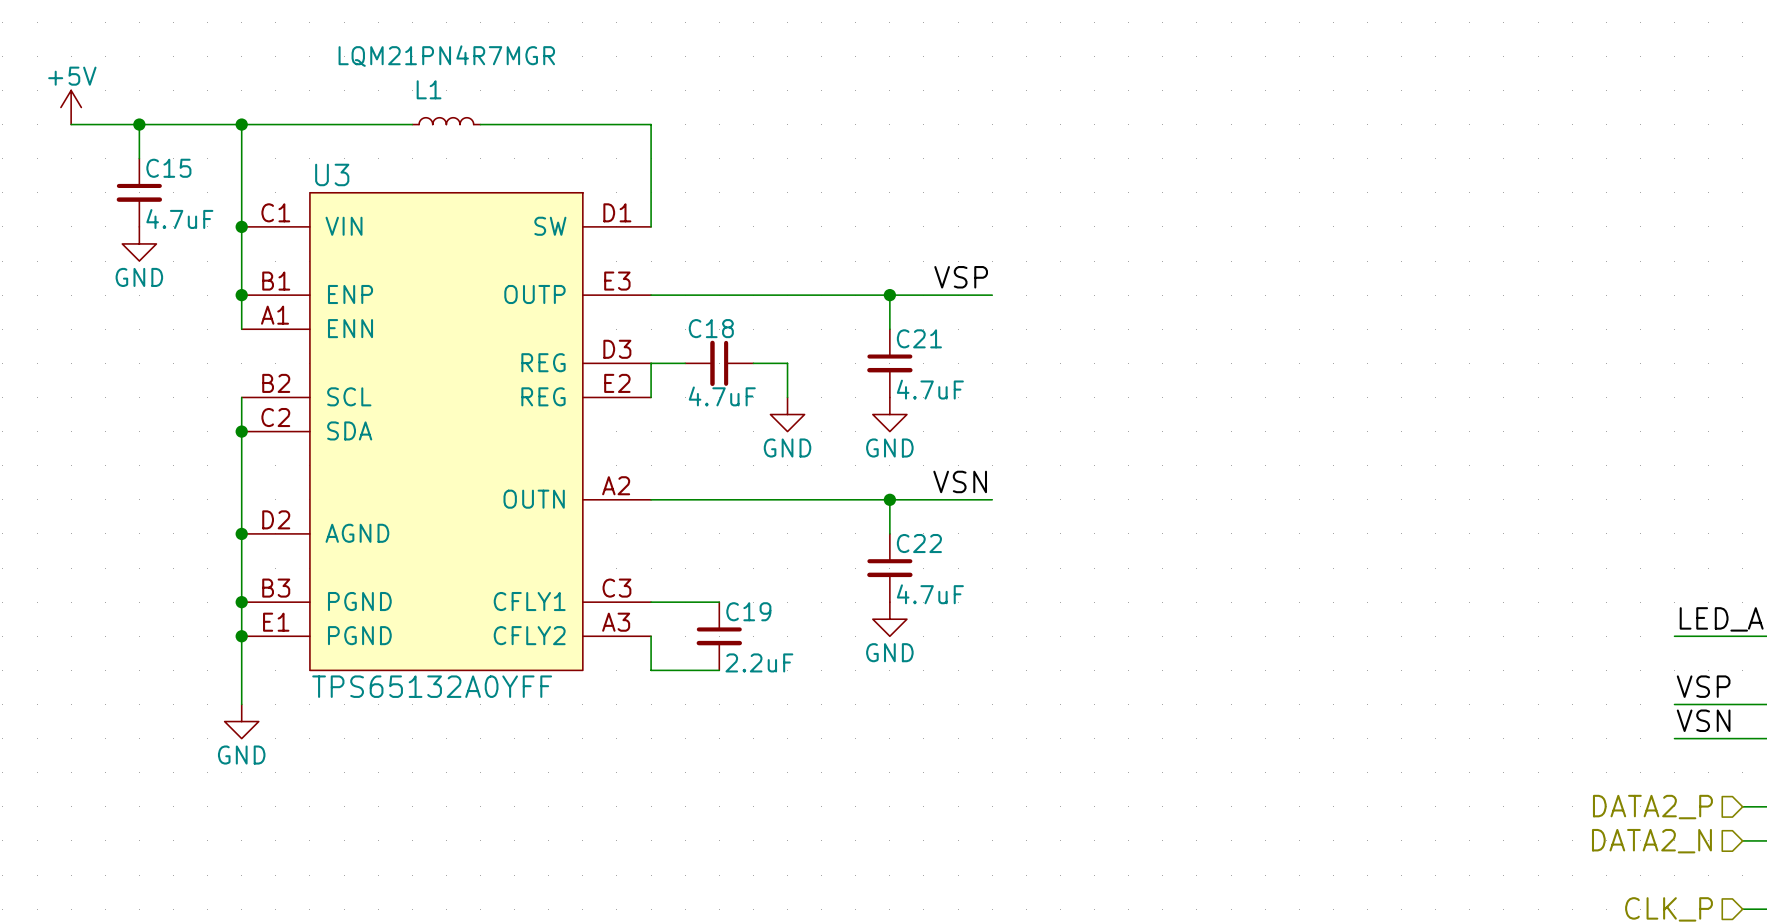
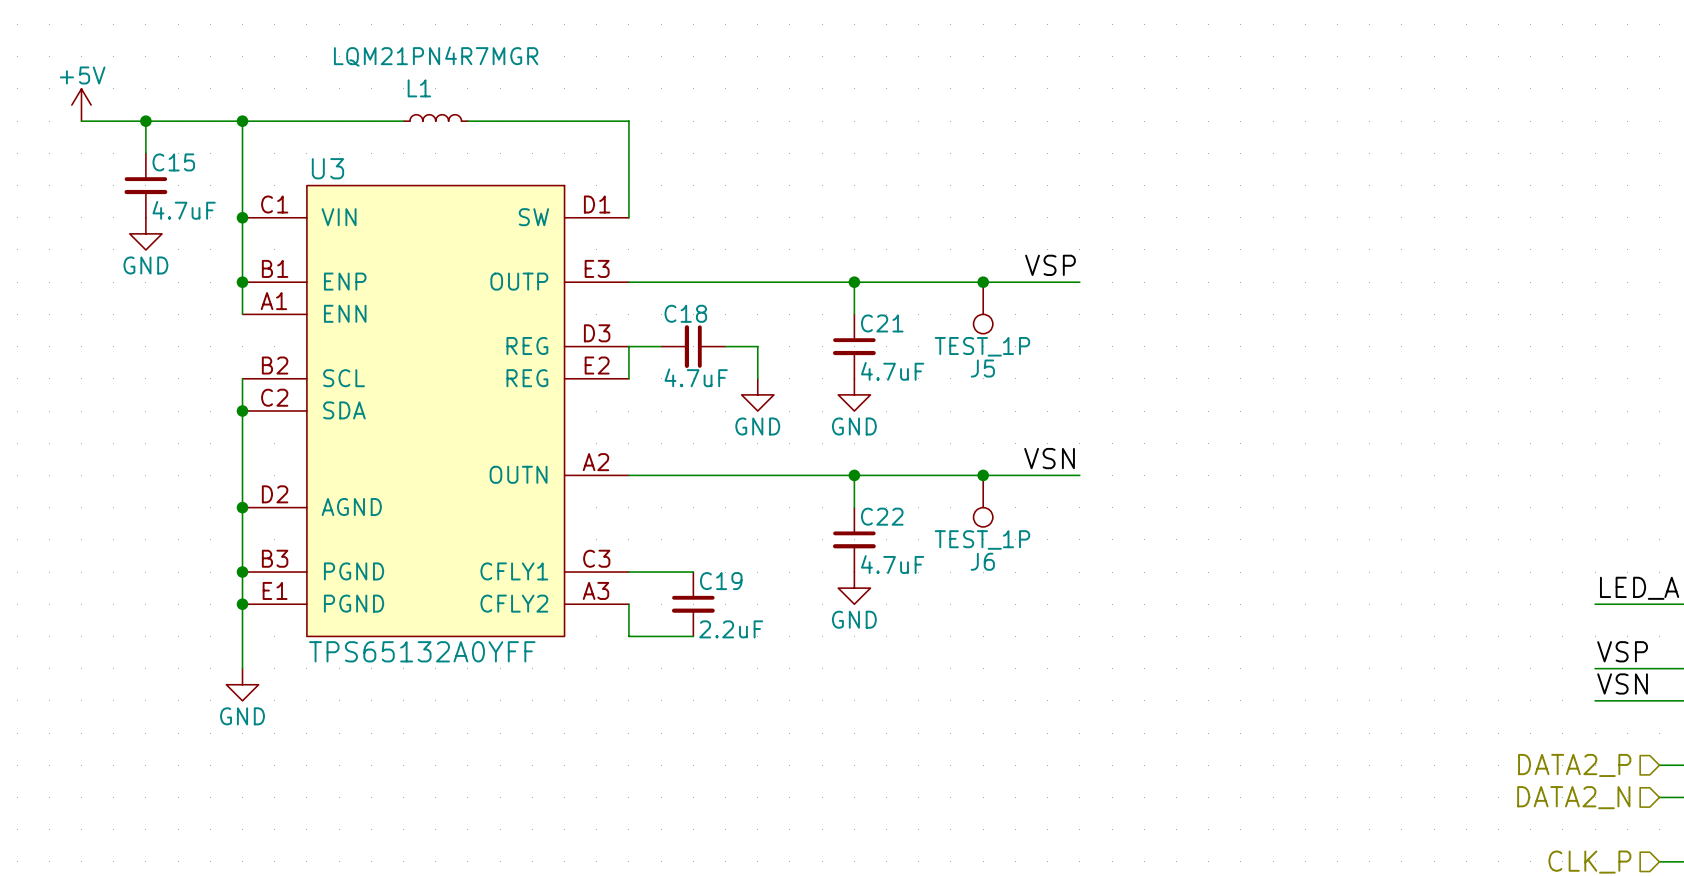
label position: VSP (961, 277) -> VSP (1050, 265)
wire: none -> (950, 282) (1079, 282)
junction: none -> (983, 282)
J5: none -> TEST_1P (983, 307)
label position: VSN (960, 481) -> VSN (1049, 458)
wire: none -> (950, 475) (1079, 475)
junction: none -> (983, 475)
J6: none -> TEST_1P (983, 501)

